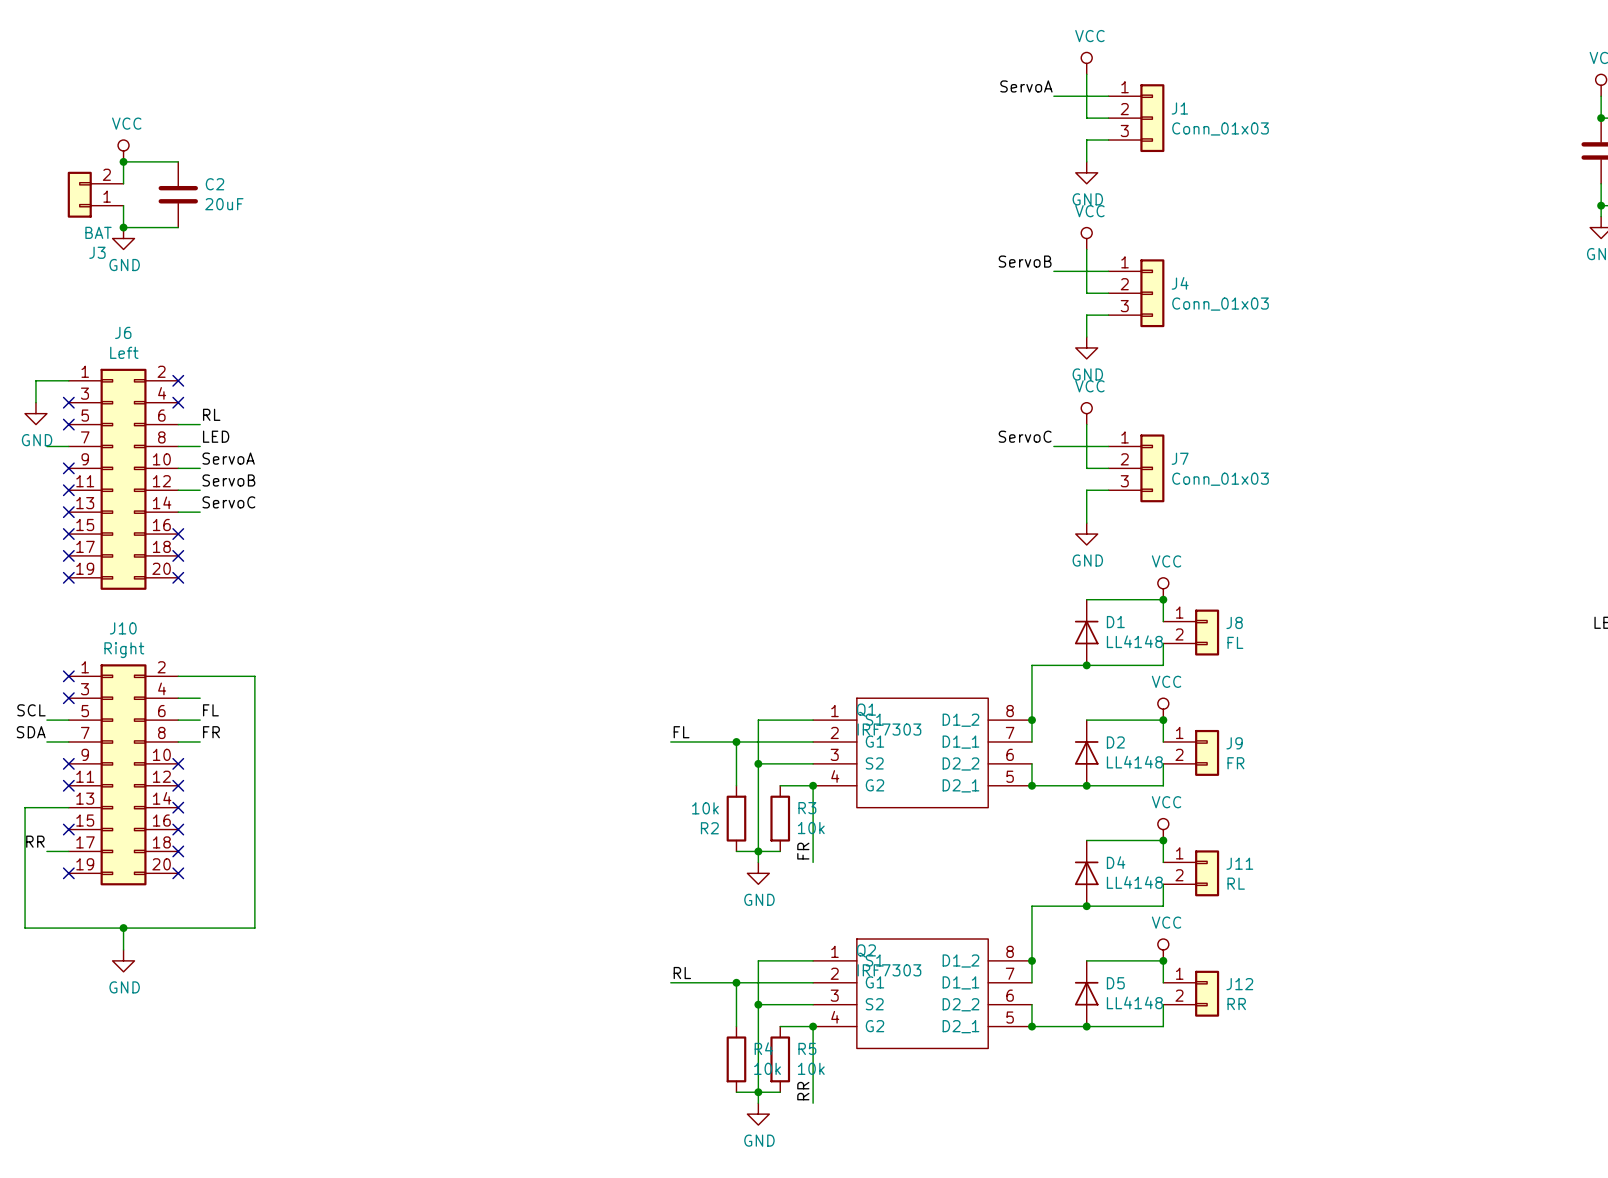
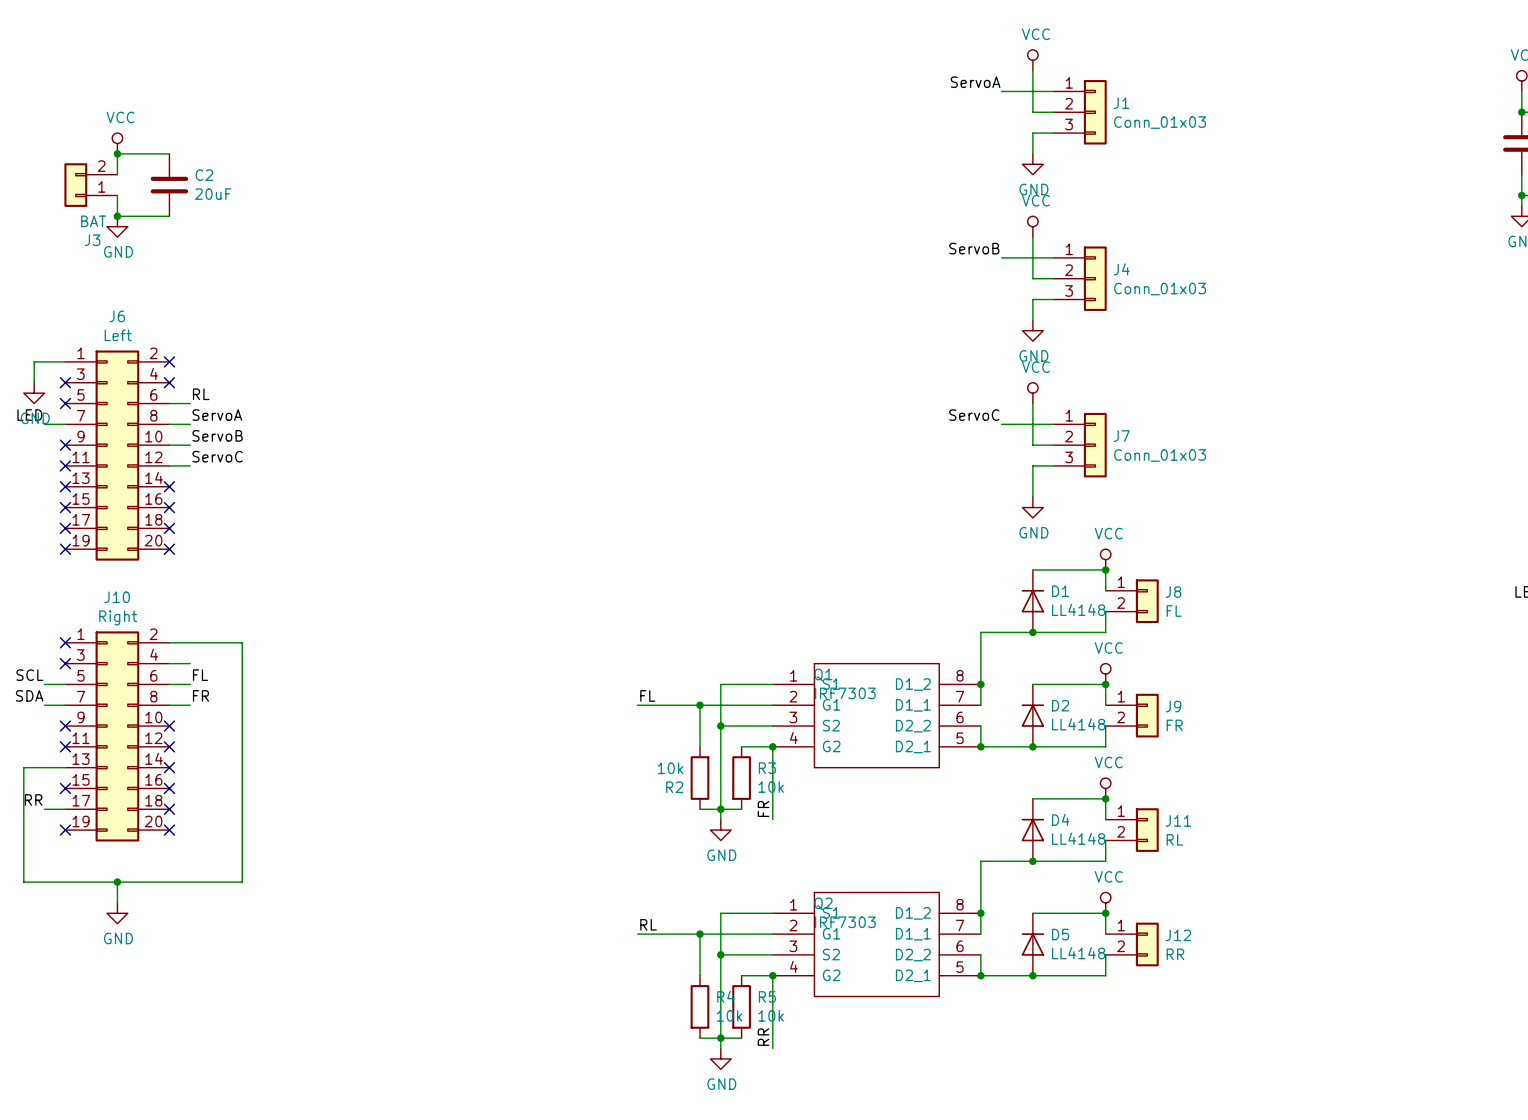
label: none -> LED (29, 415)
label: LED (216, 436) -> ServoA (217, 415)
label: ServoA (228, 458) -> ServoB (217, 435)
label: ServoB (228, 480) -> ServoC (217, 456)
label: ServoC (228, 502) -> none
wire: (178, 512) (200, 512) -> none
no-connect mark: none -> (169, 486)

